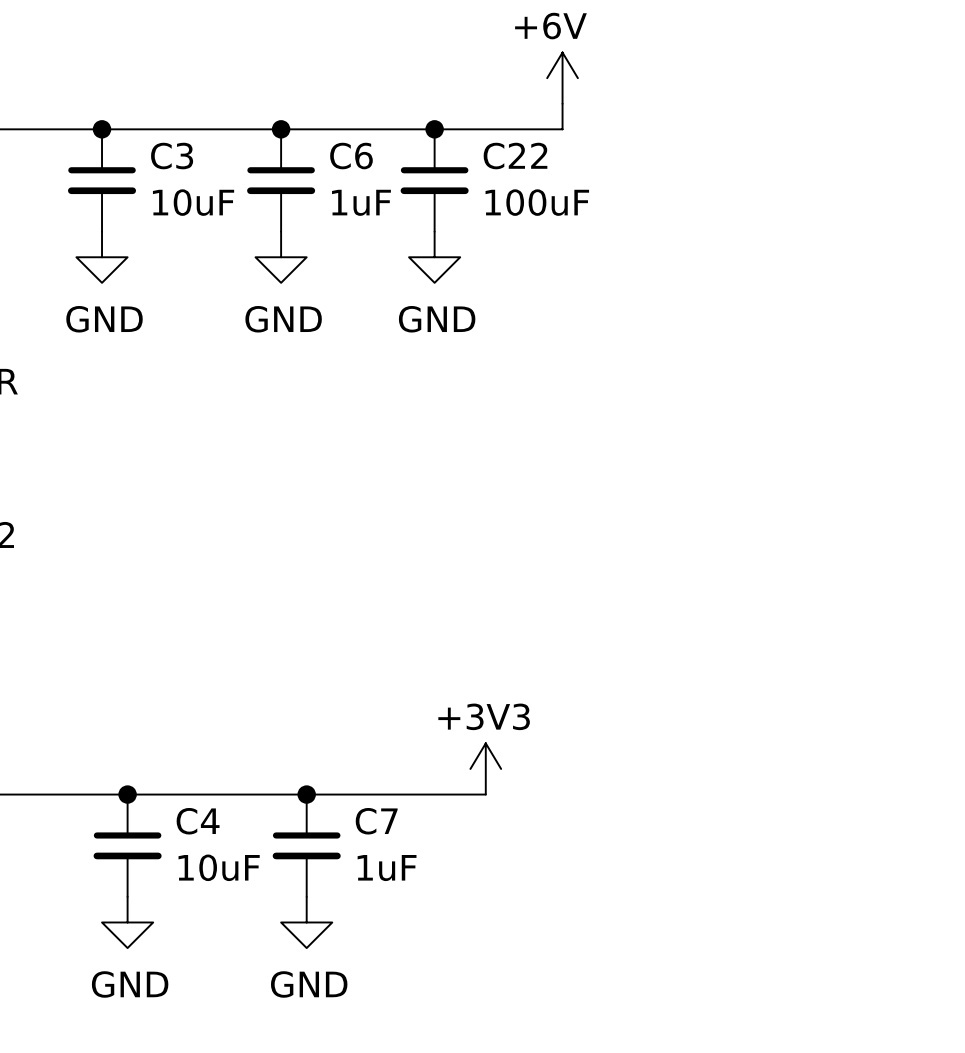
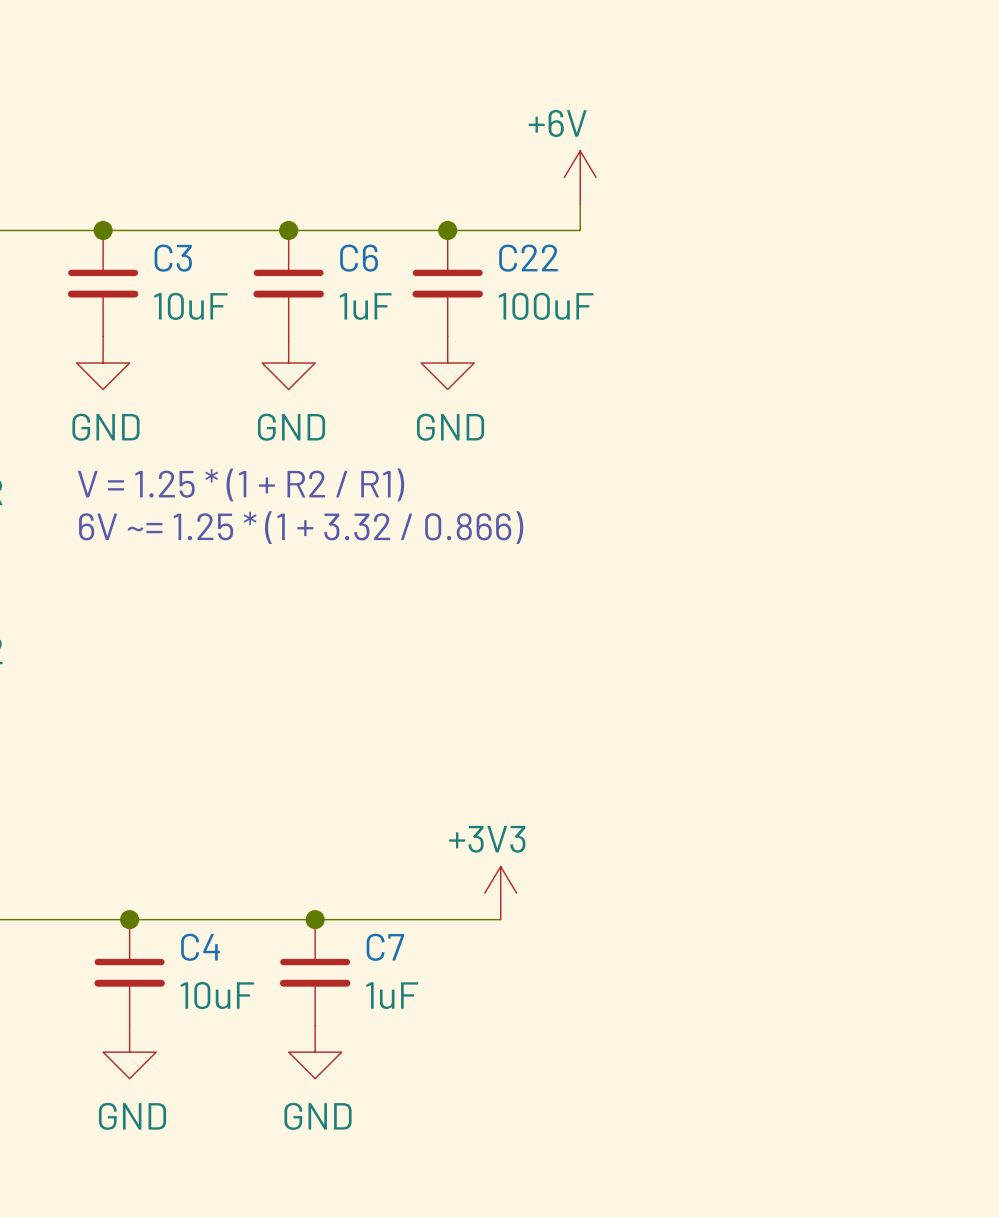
text: none -> V = 1.25 * (1 + R2 / R1) (241, 484)
text: none -> 6V ~= 1.25 * (1 + 3.32 / 0.866) (301, 527)

